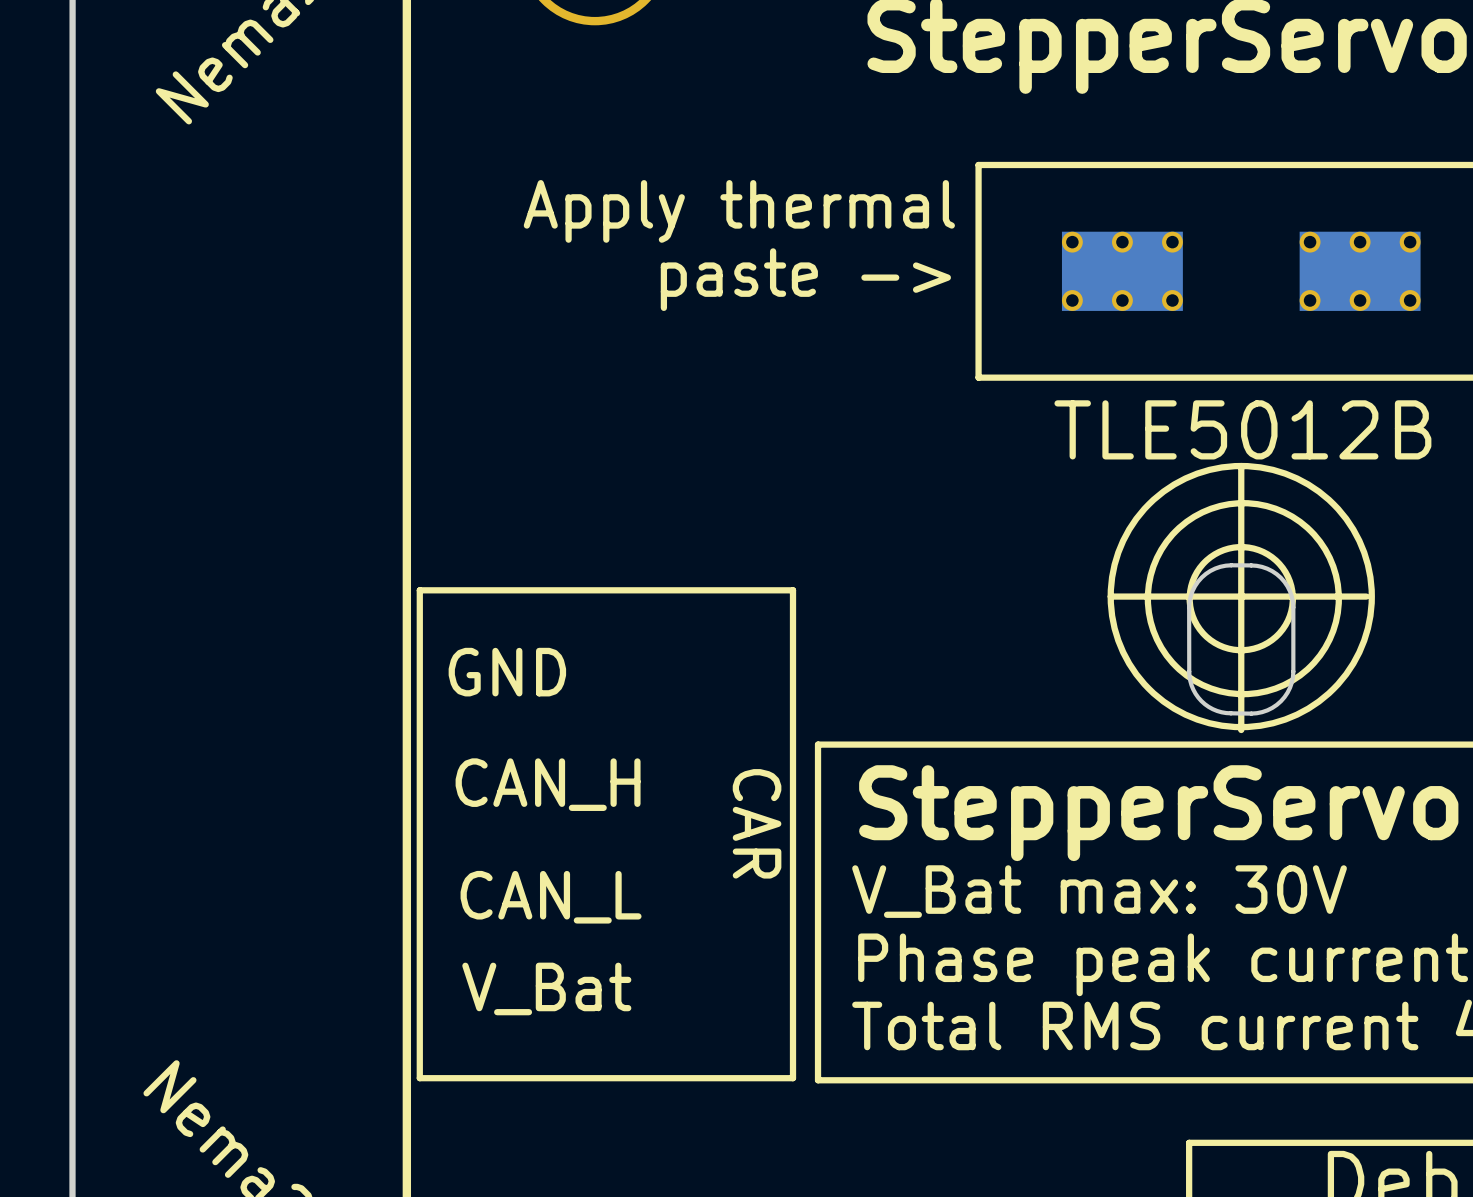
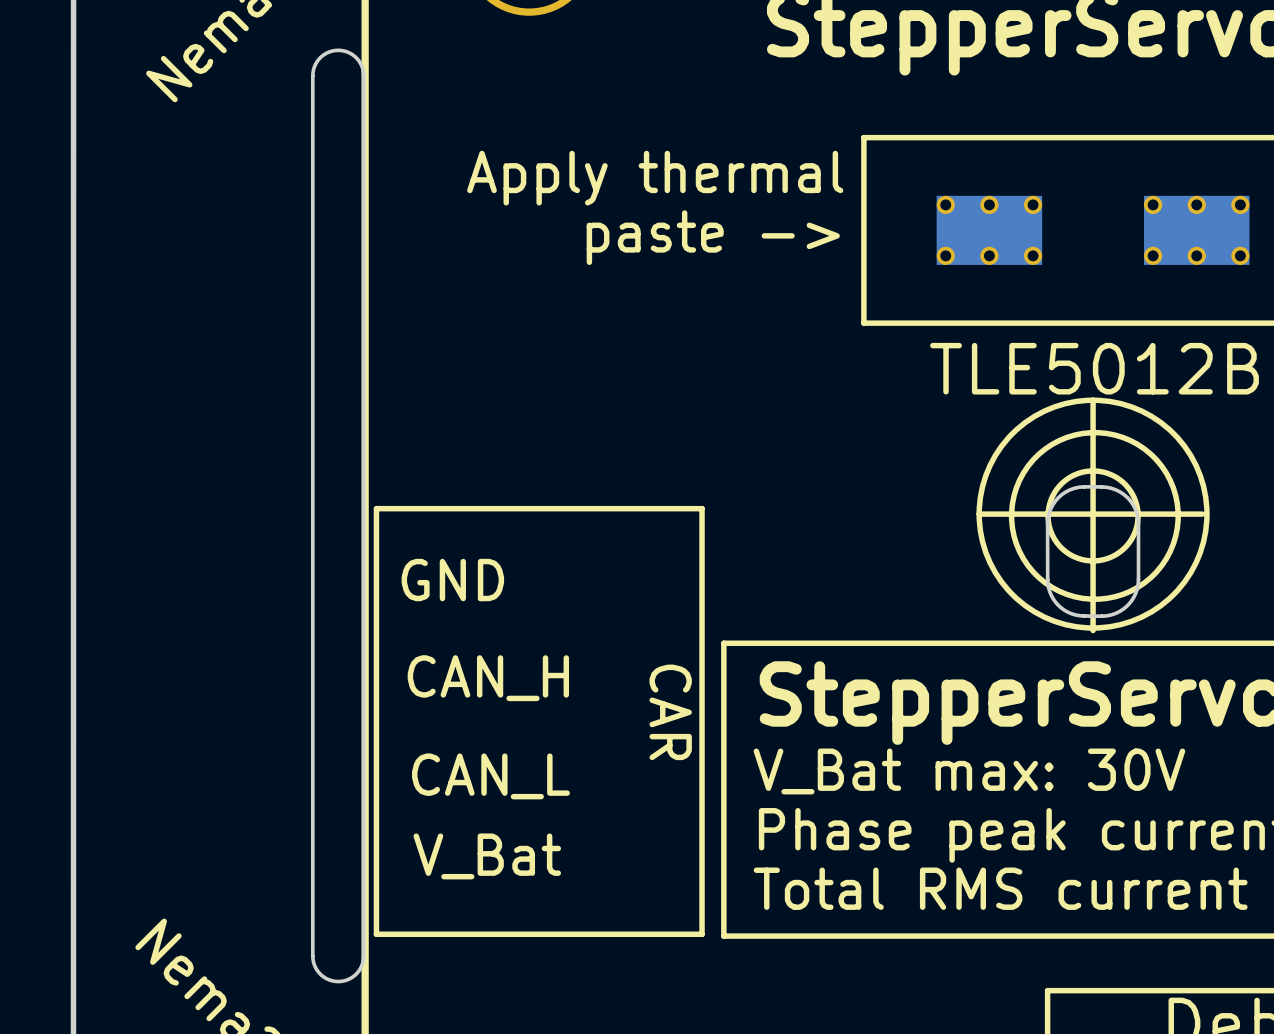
board edge: none -> (363, 75) (363, 956) (360, 967) (355, 975) (347, 979) (338, 981) (326, 978) (319, 972) (314, 965) (312, 956) (312, 75) (314, 66) (319, 58) (326, 53) (338, 50) (347, 51) (355, 56) (362, 66) (363, 75)

